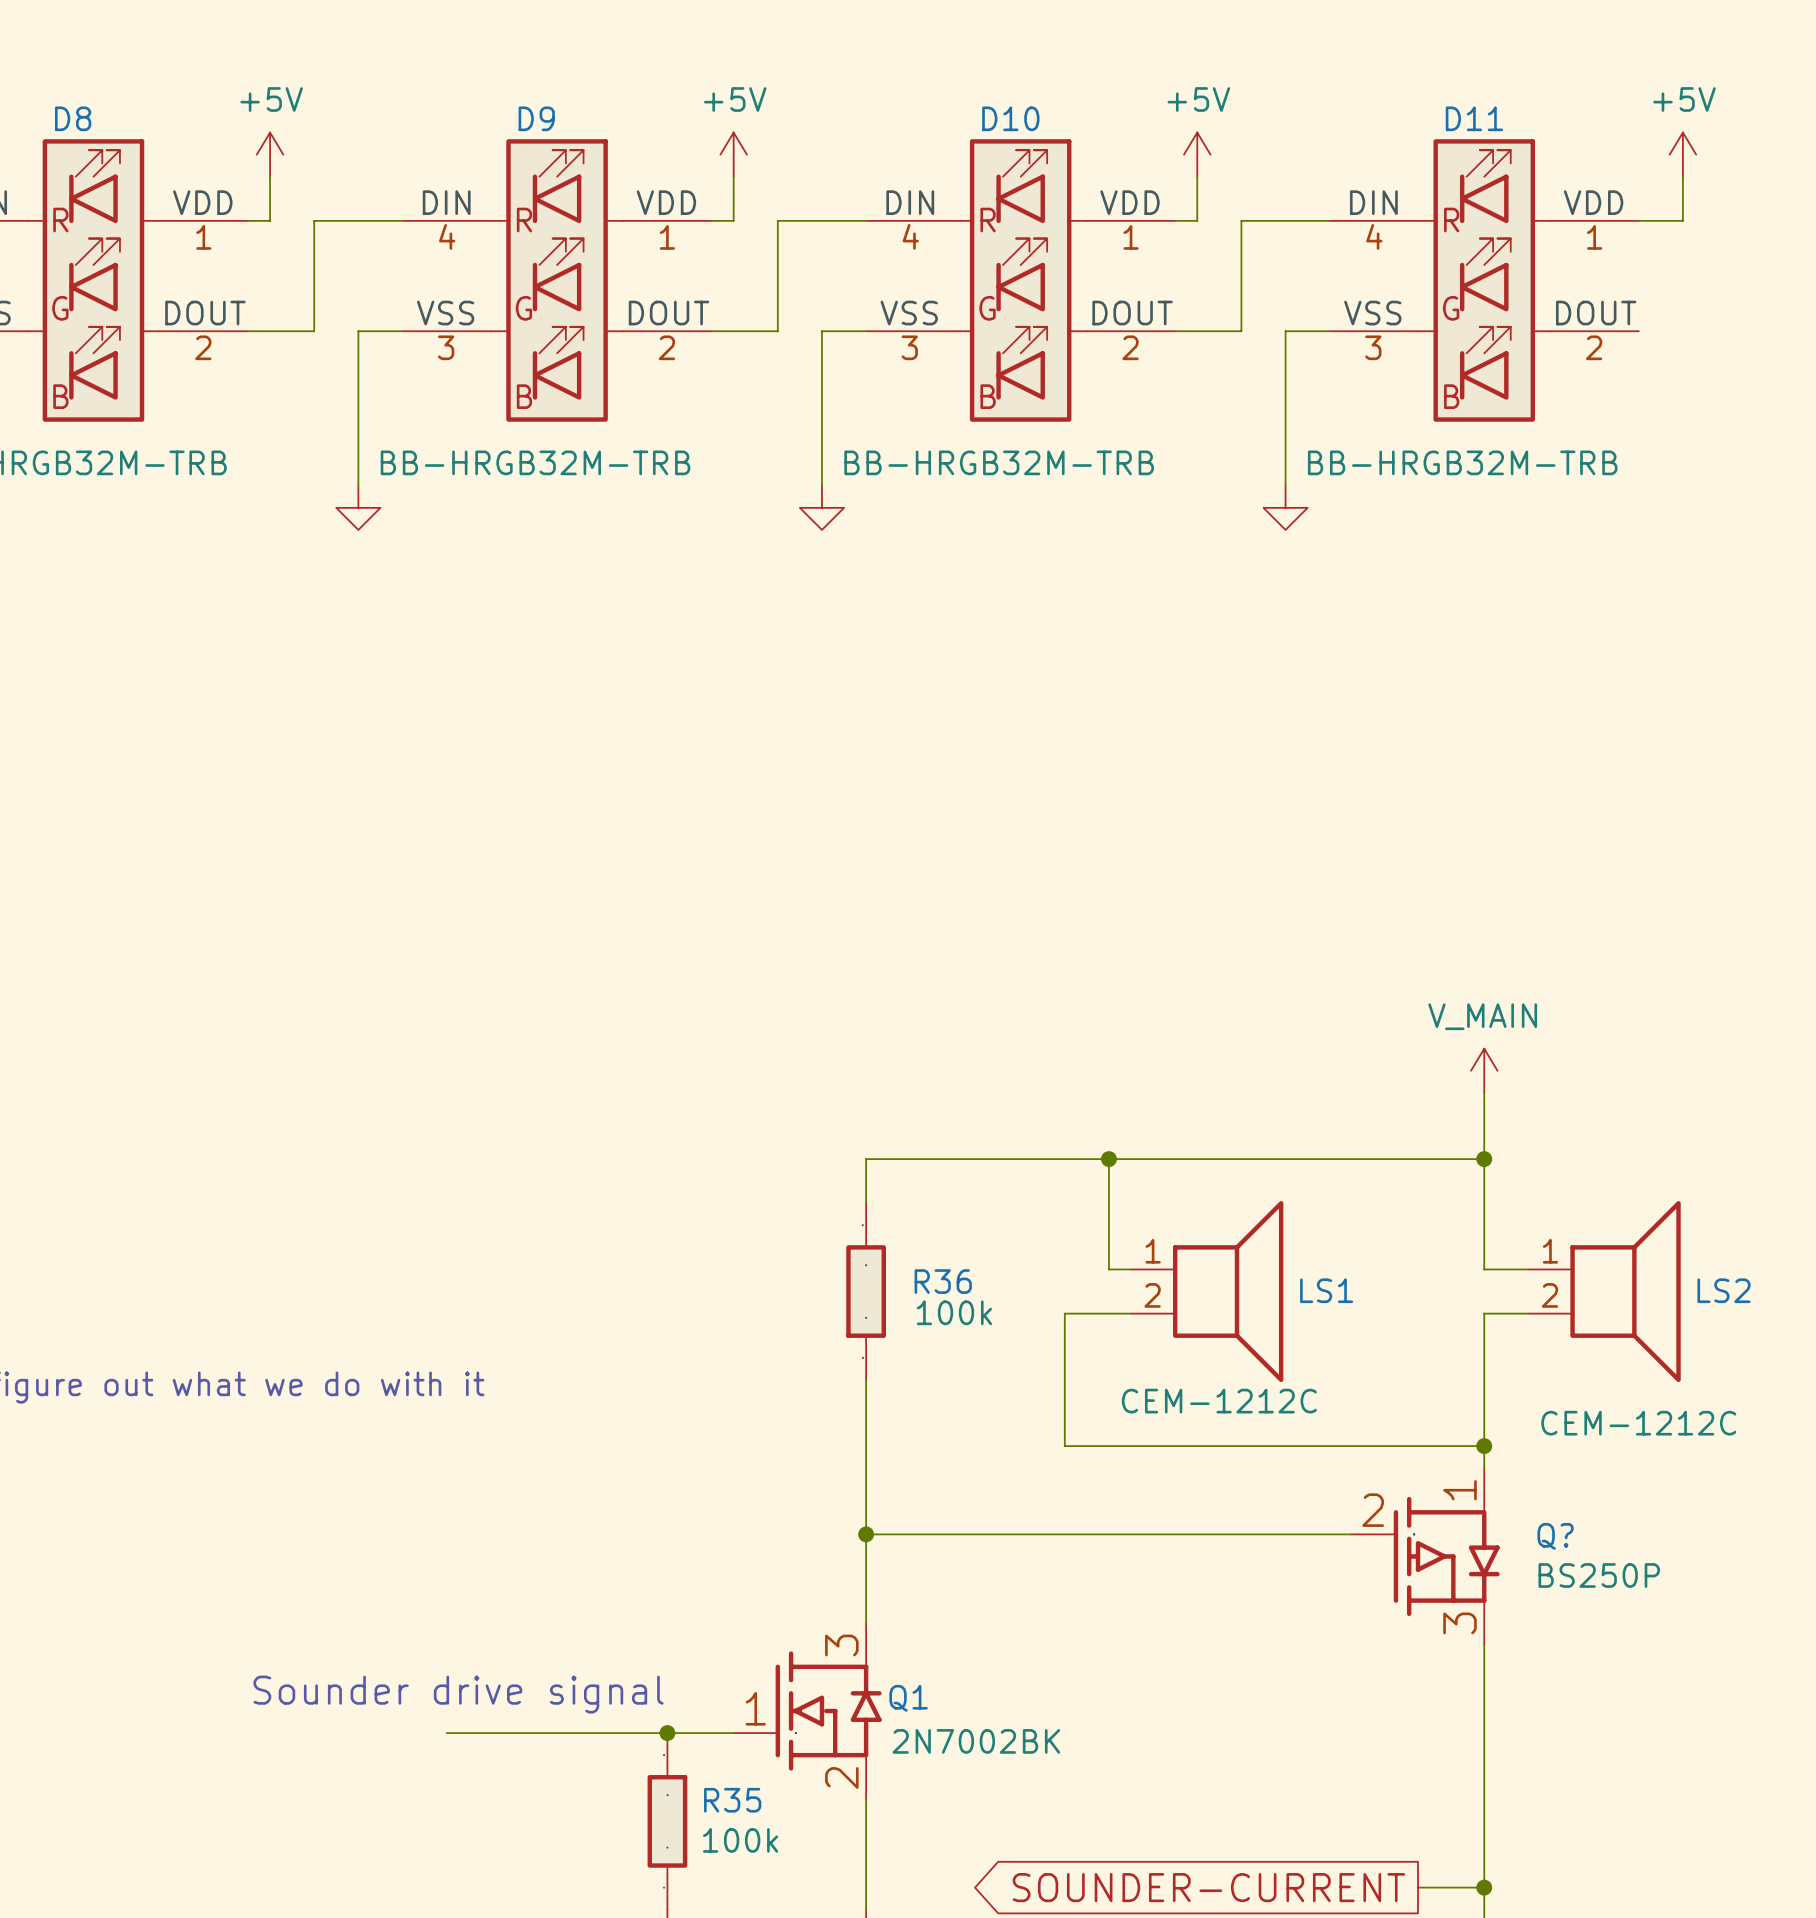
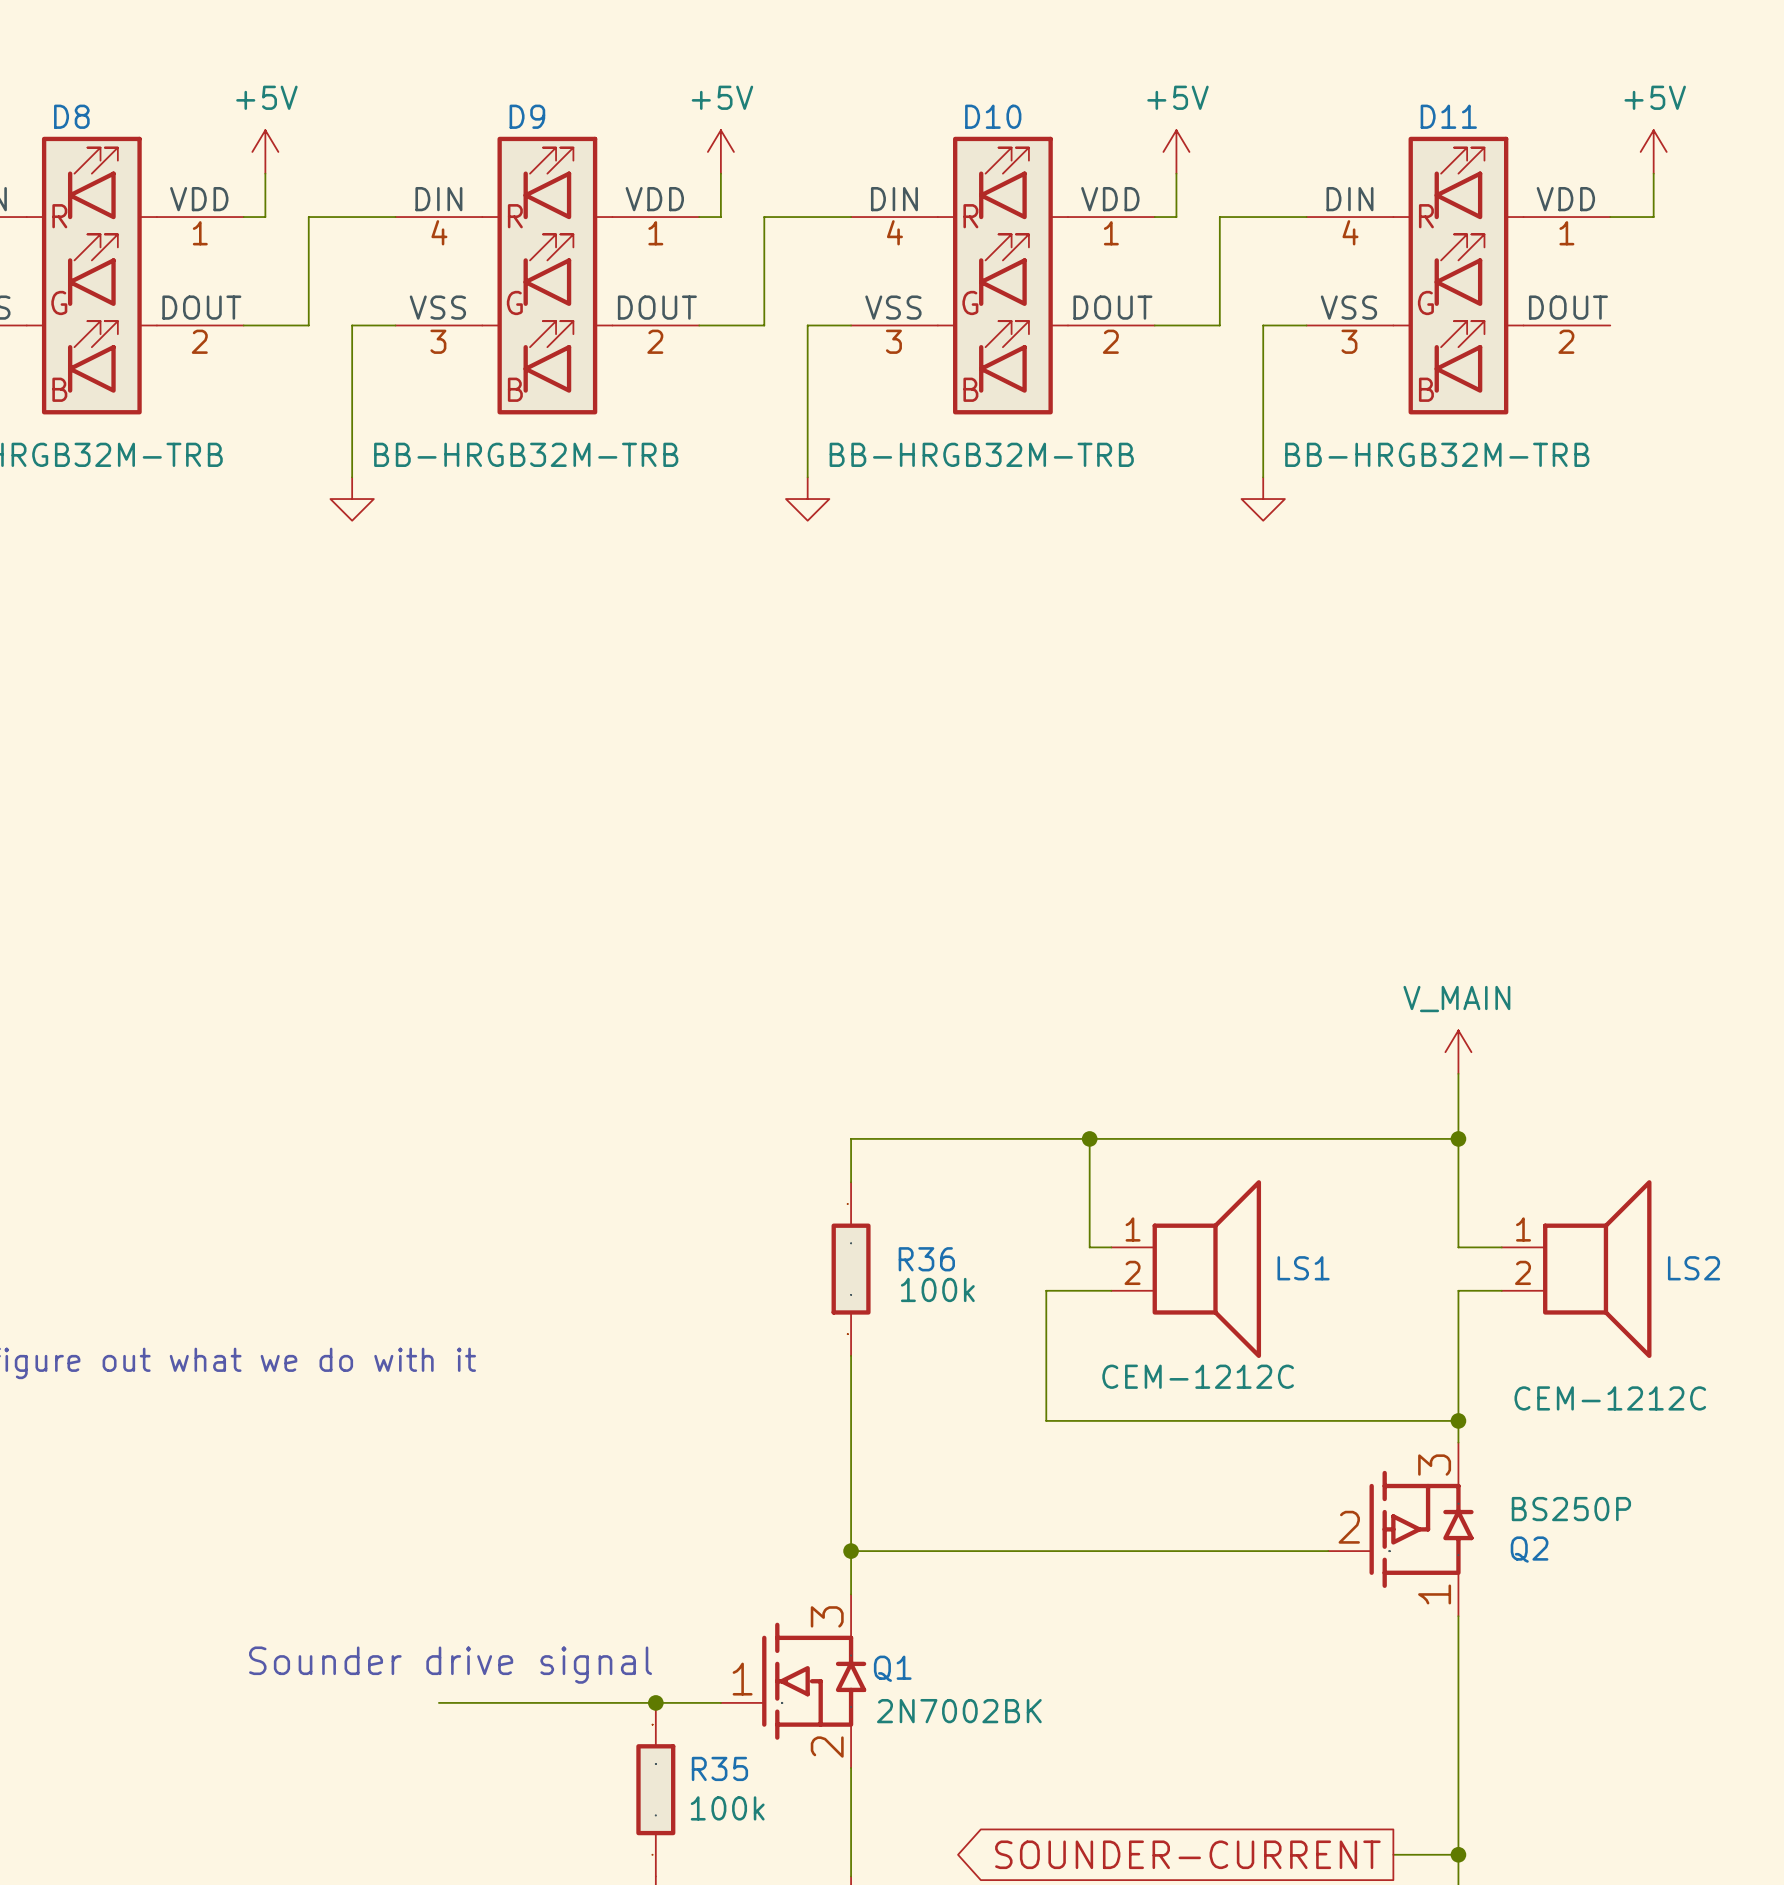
wire: (866, 1534) (1351, 1534) -> (851, 1551) (1328, 1551)
junction position: (866, 1534) -> (851, 1551)
Q?: BS250P (1425, 1556) -> none
Q2: none -> BS250P (1400, 1529)

